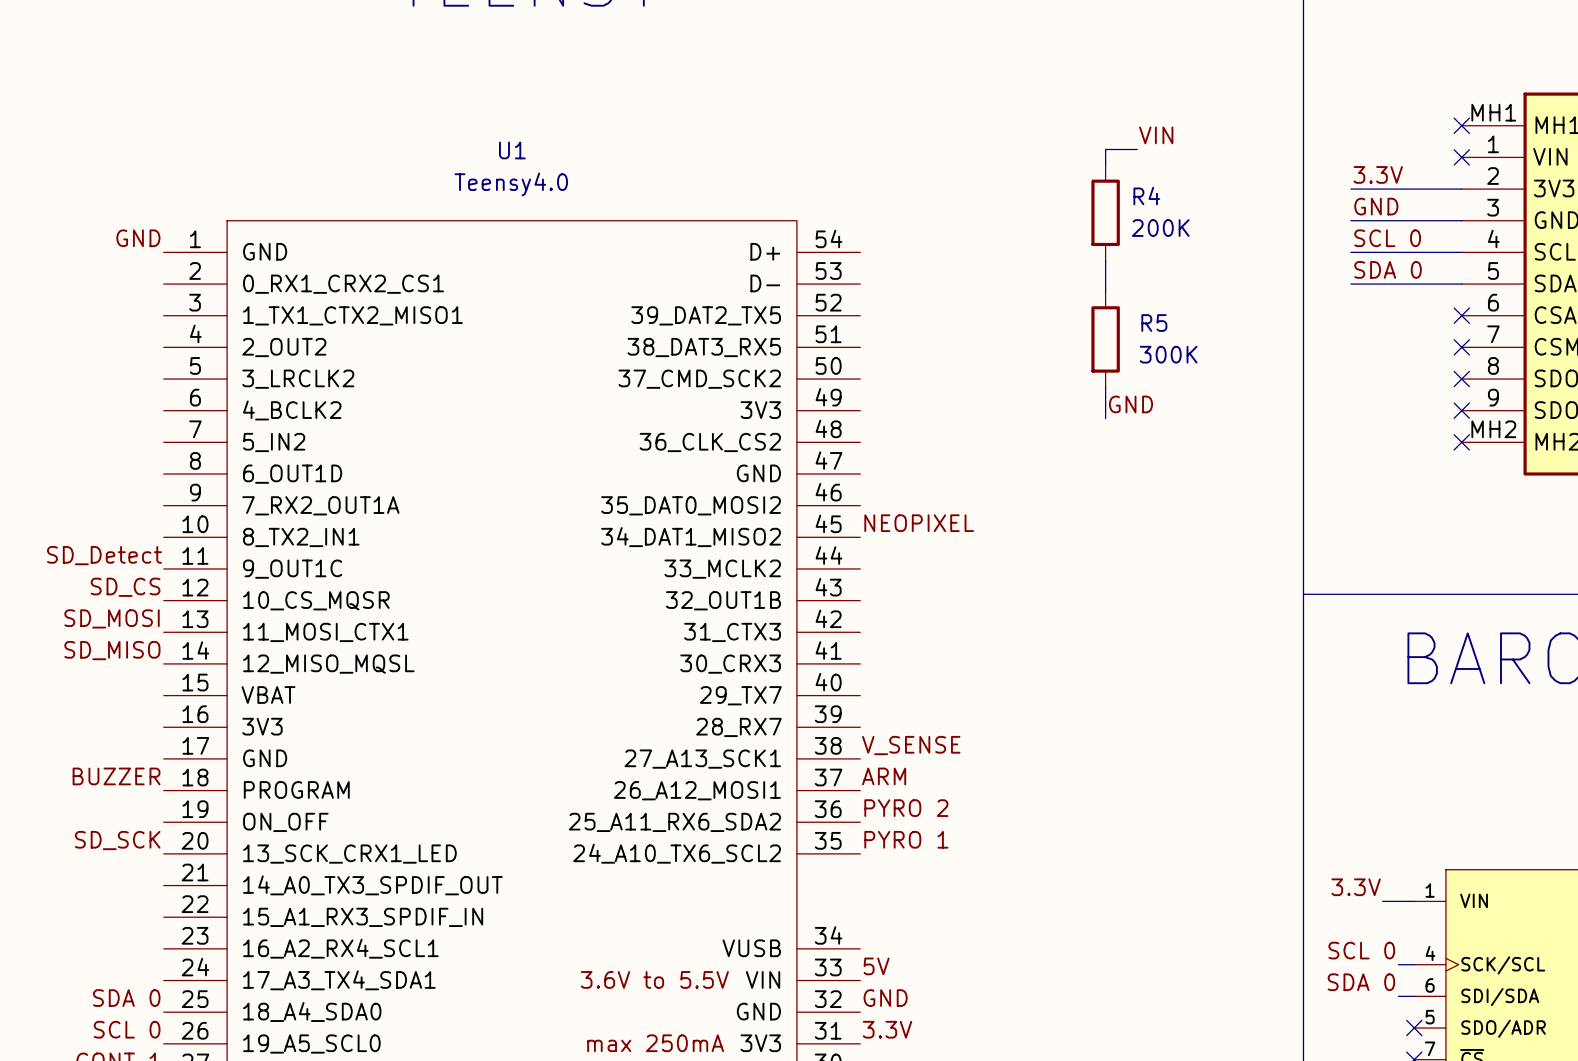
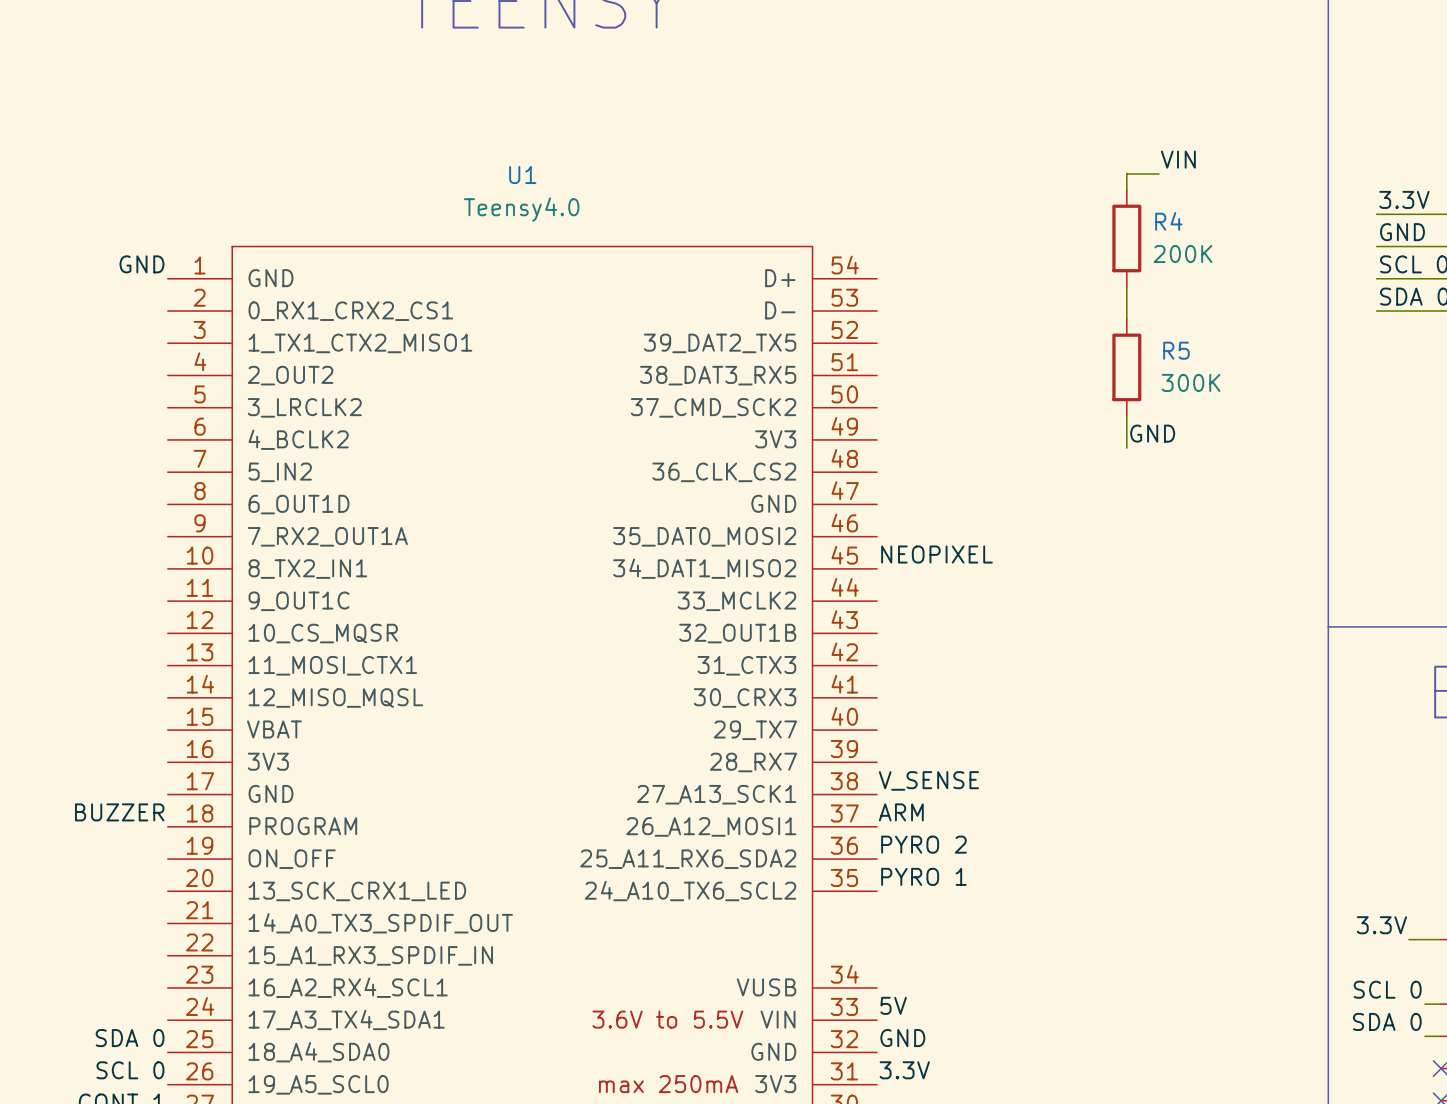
label: SD_Detect (104, 555) -> none
label: SD_CS (125, 587) -> none
label: SD_MOSI (112, 618) -> none
label: SD_MISO (112, 650) -> none
label: SD_SCK (117, 840) -> none

